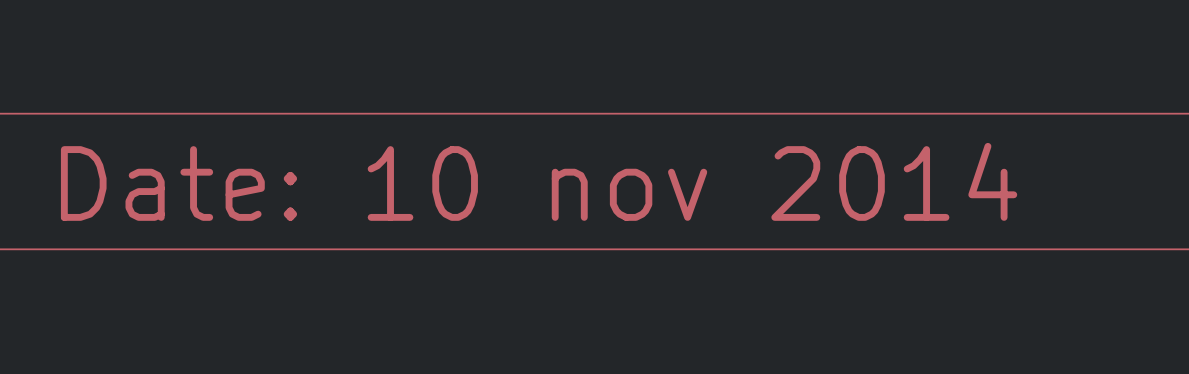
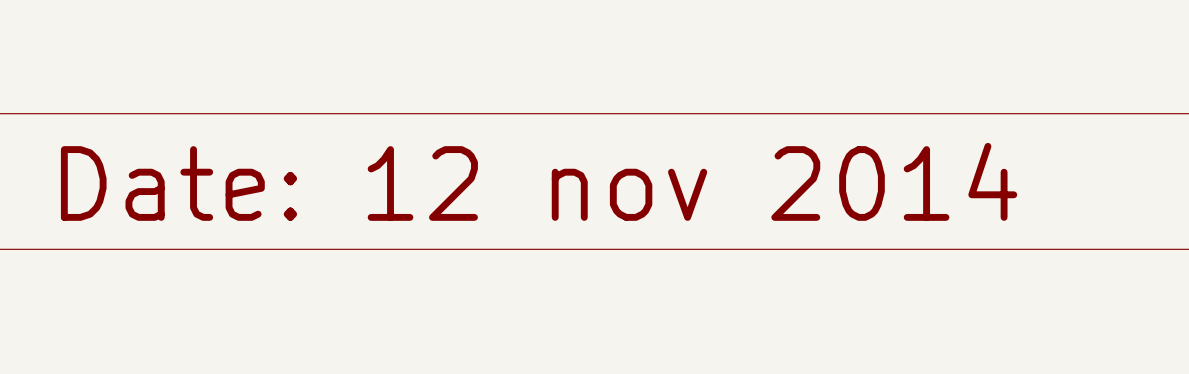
title block: Date: 10 nov 2014 (539, 181) -> Date: 12 nov 2014 (539, 181)

